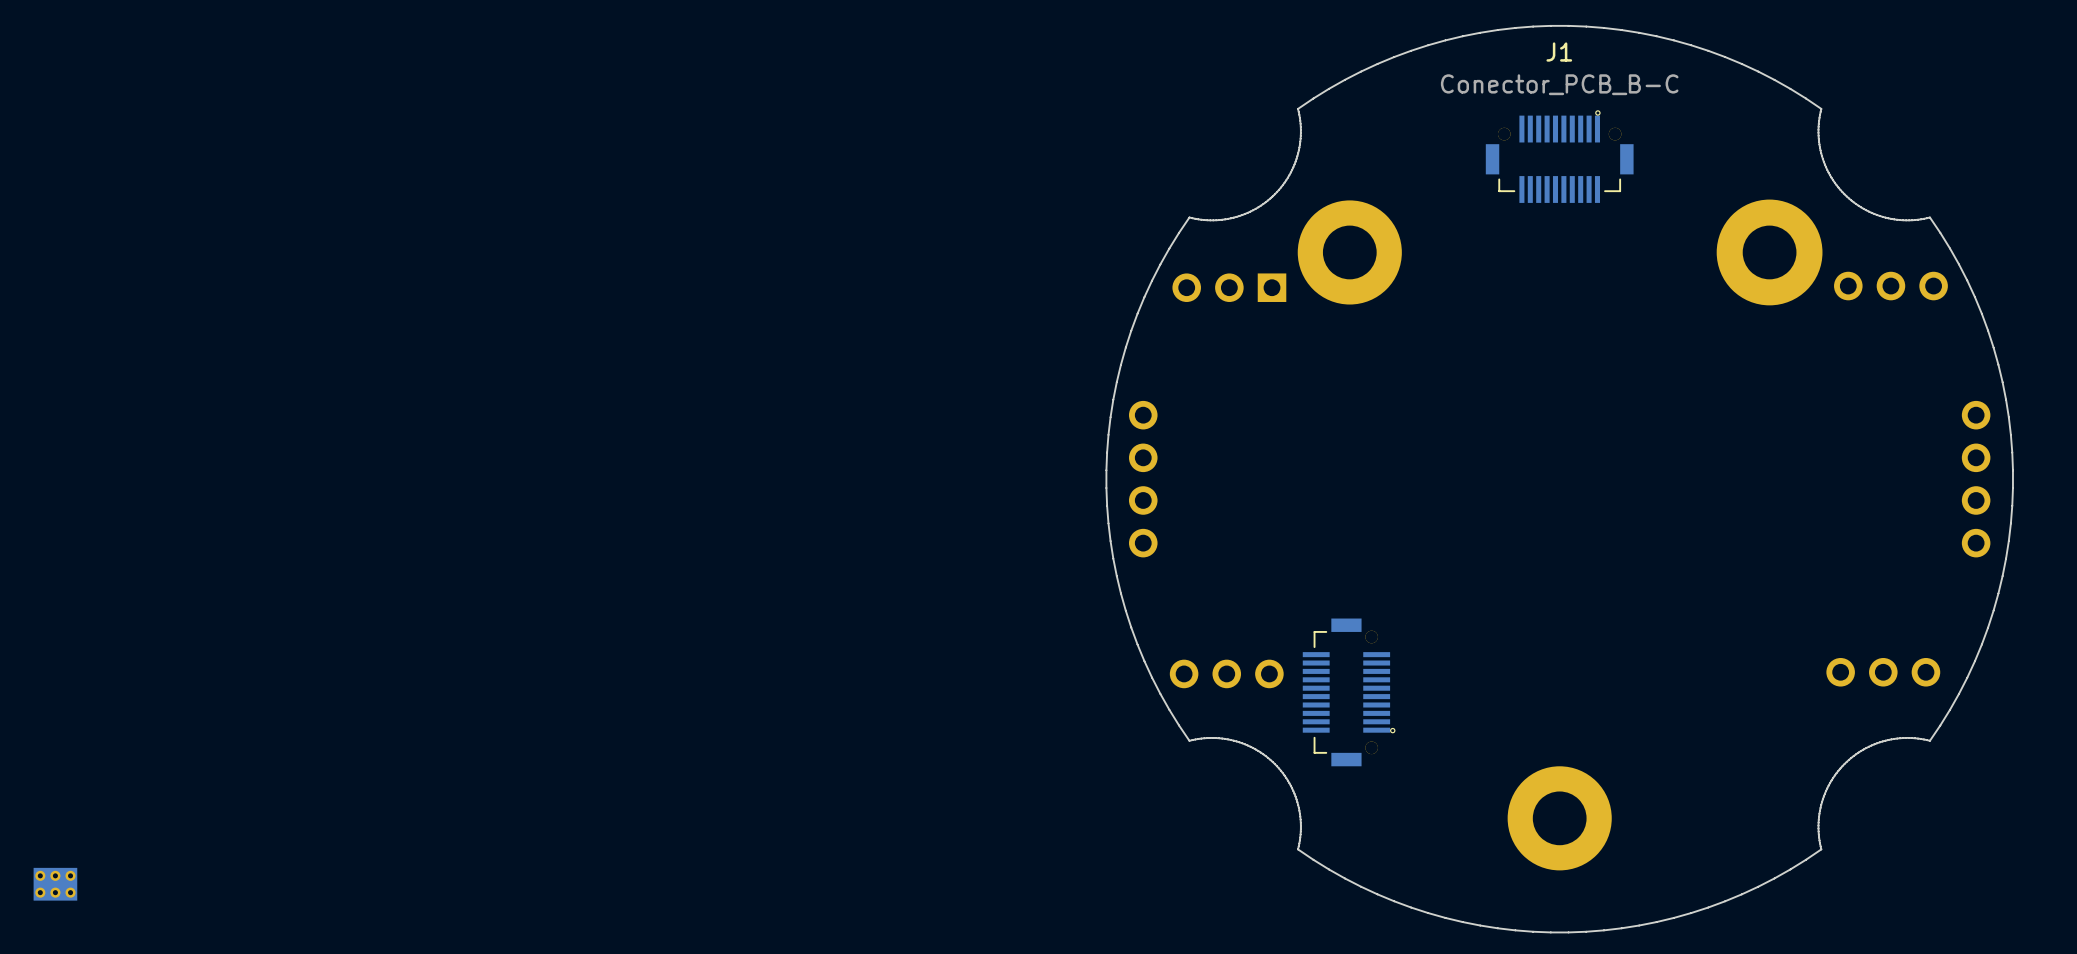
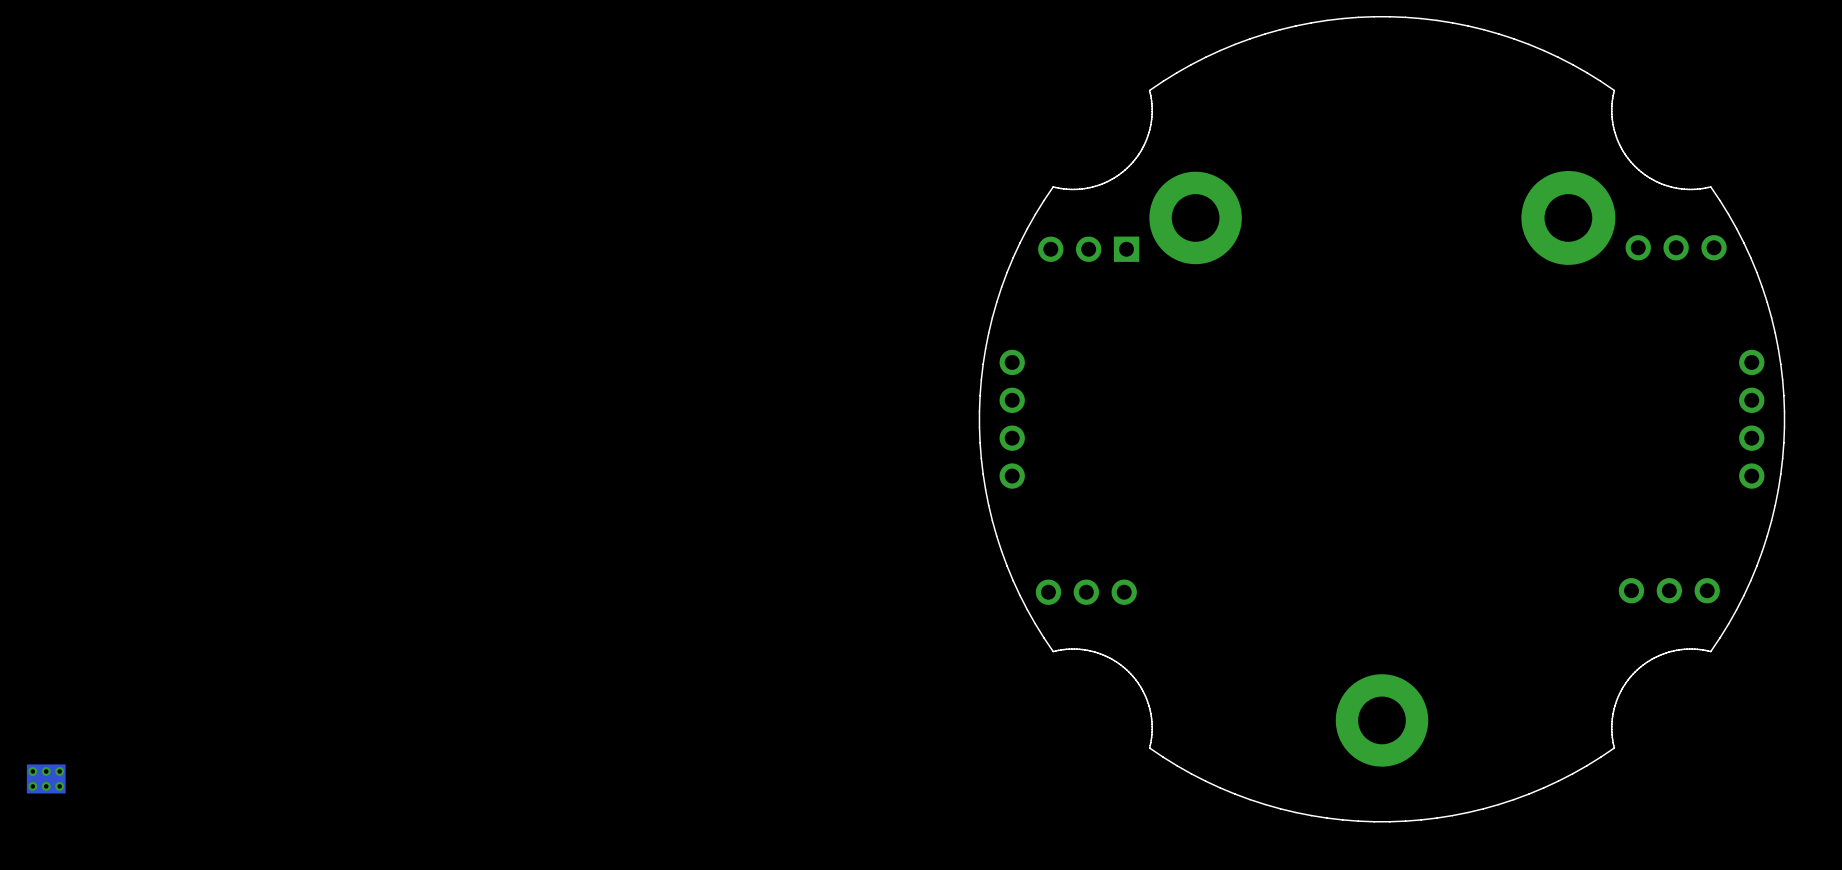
J1: Conector_PCB_B-C (1468, 438) -> none

